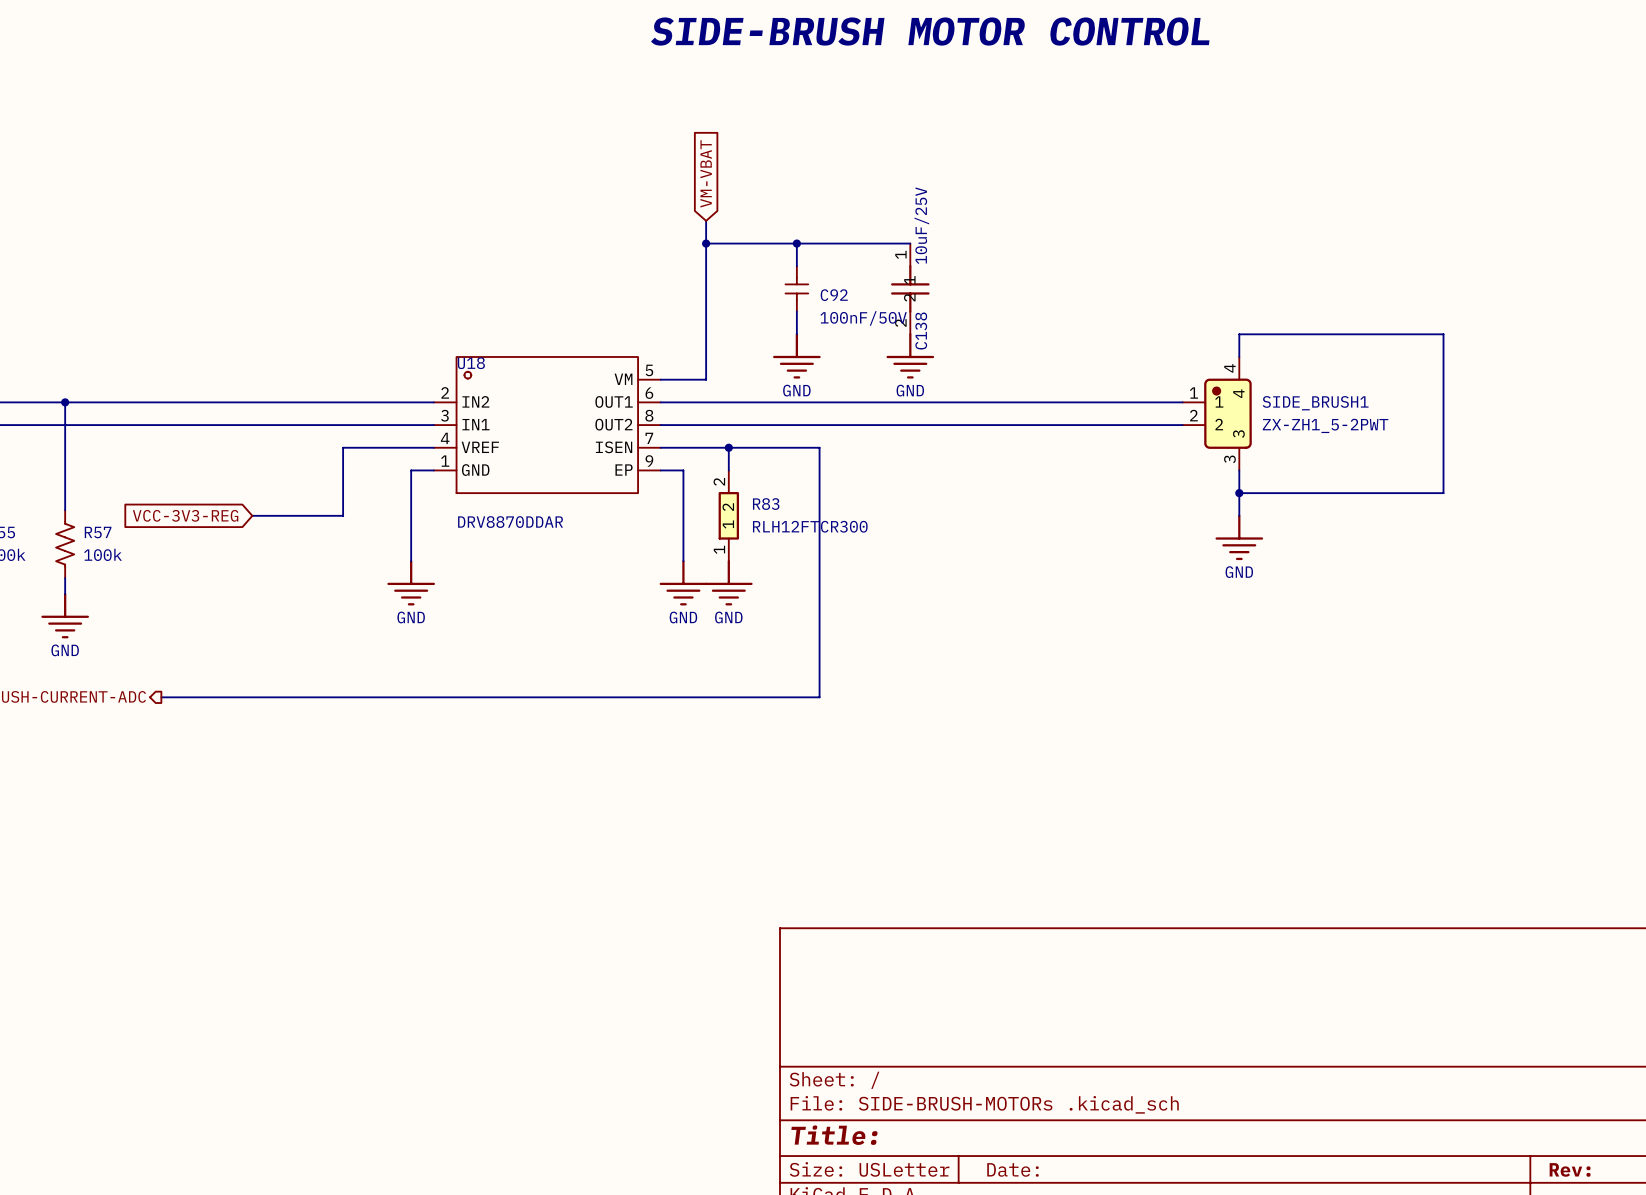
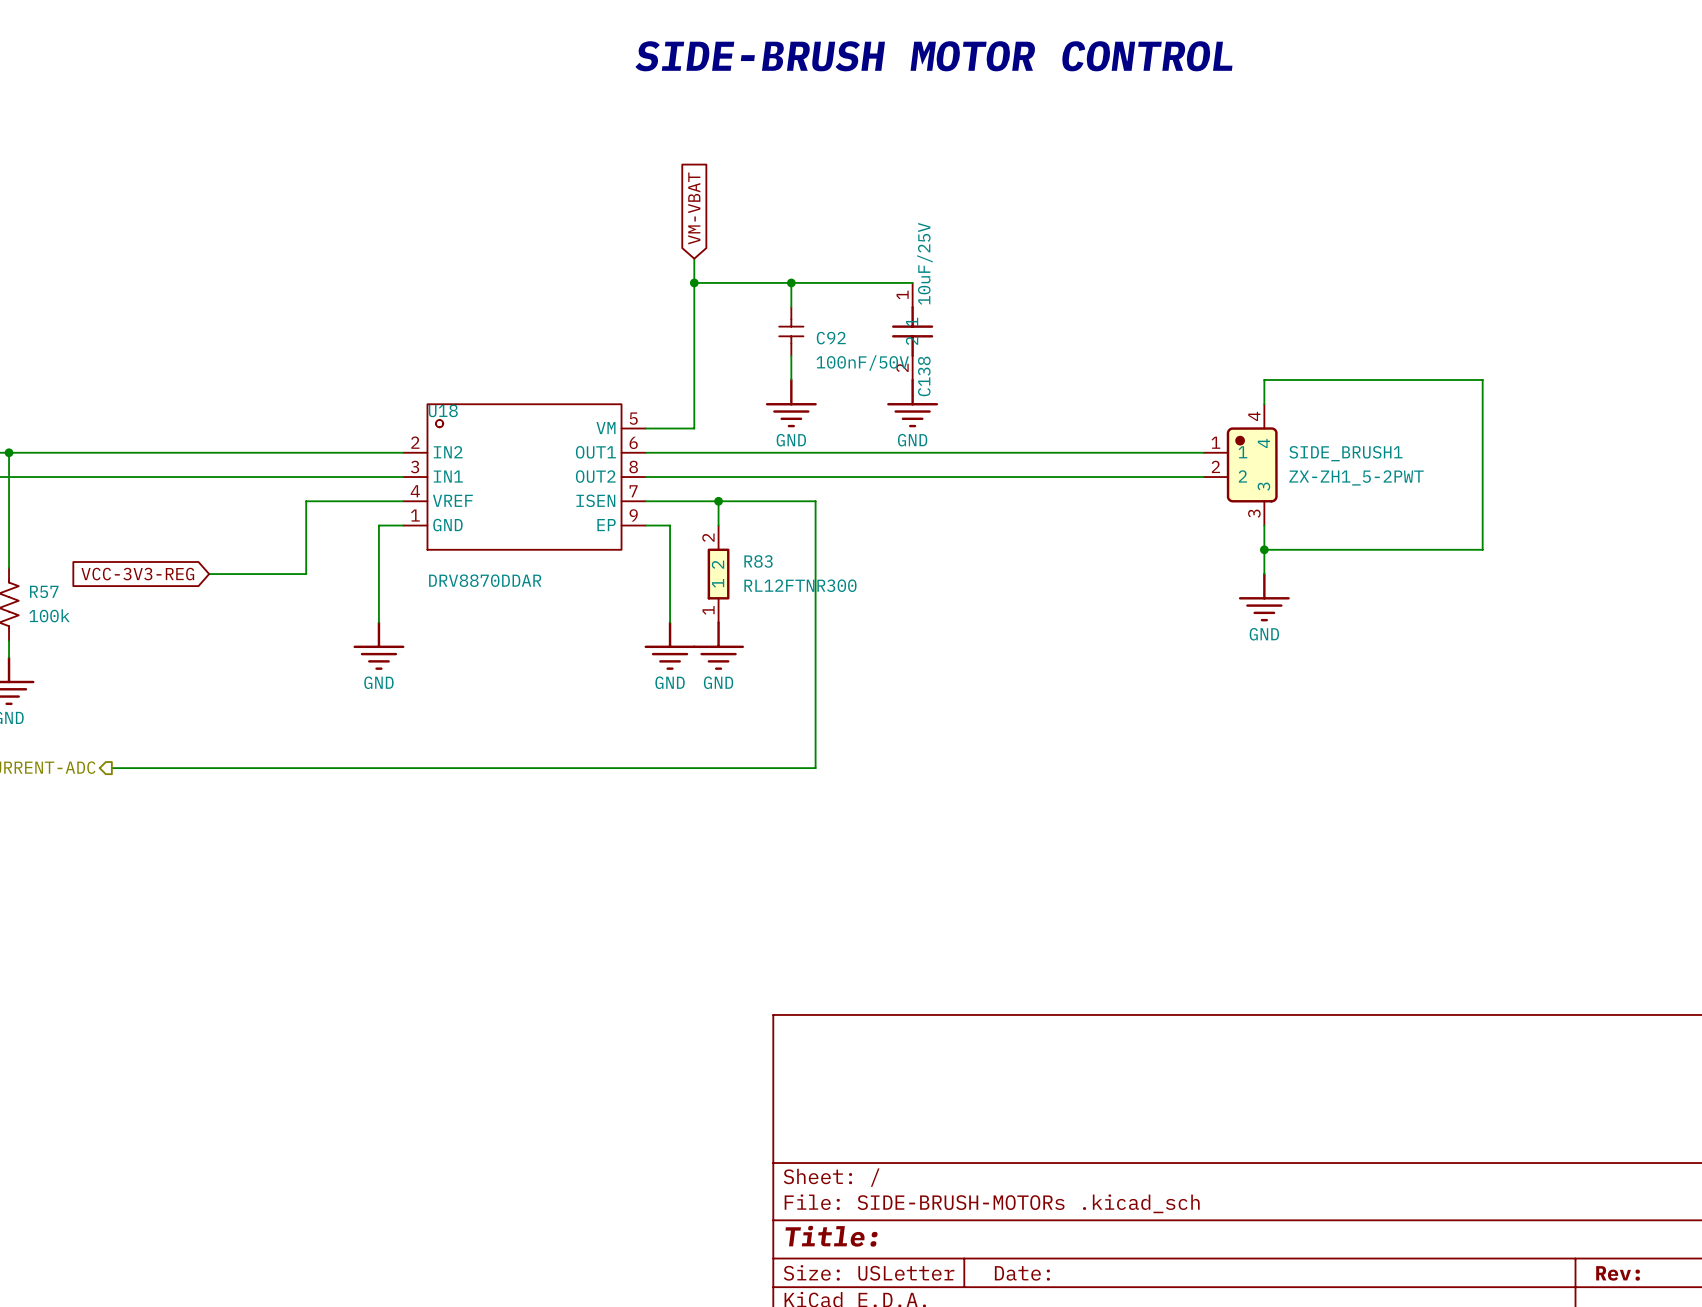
R83 value: RLH12FTCR300 (810, 526) -> RL12FTNR300 (800, 585)

